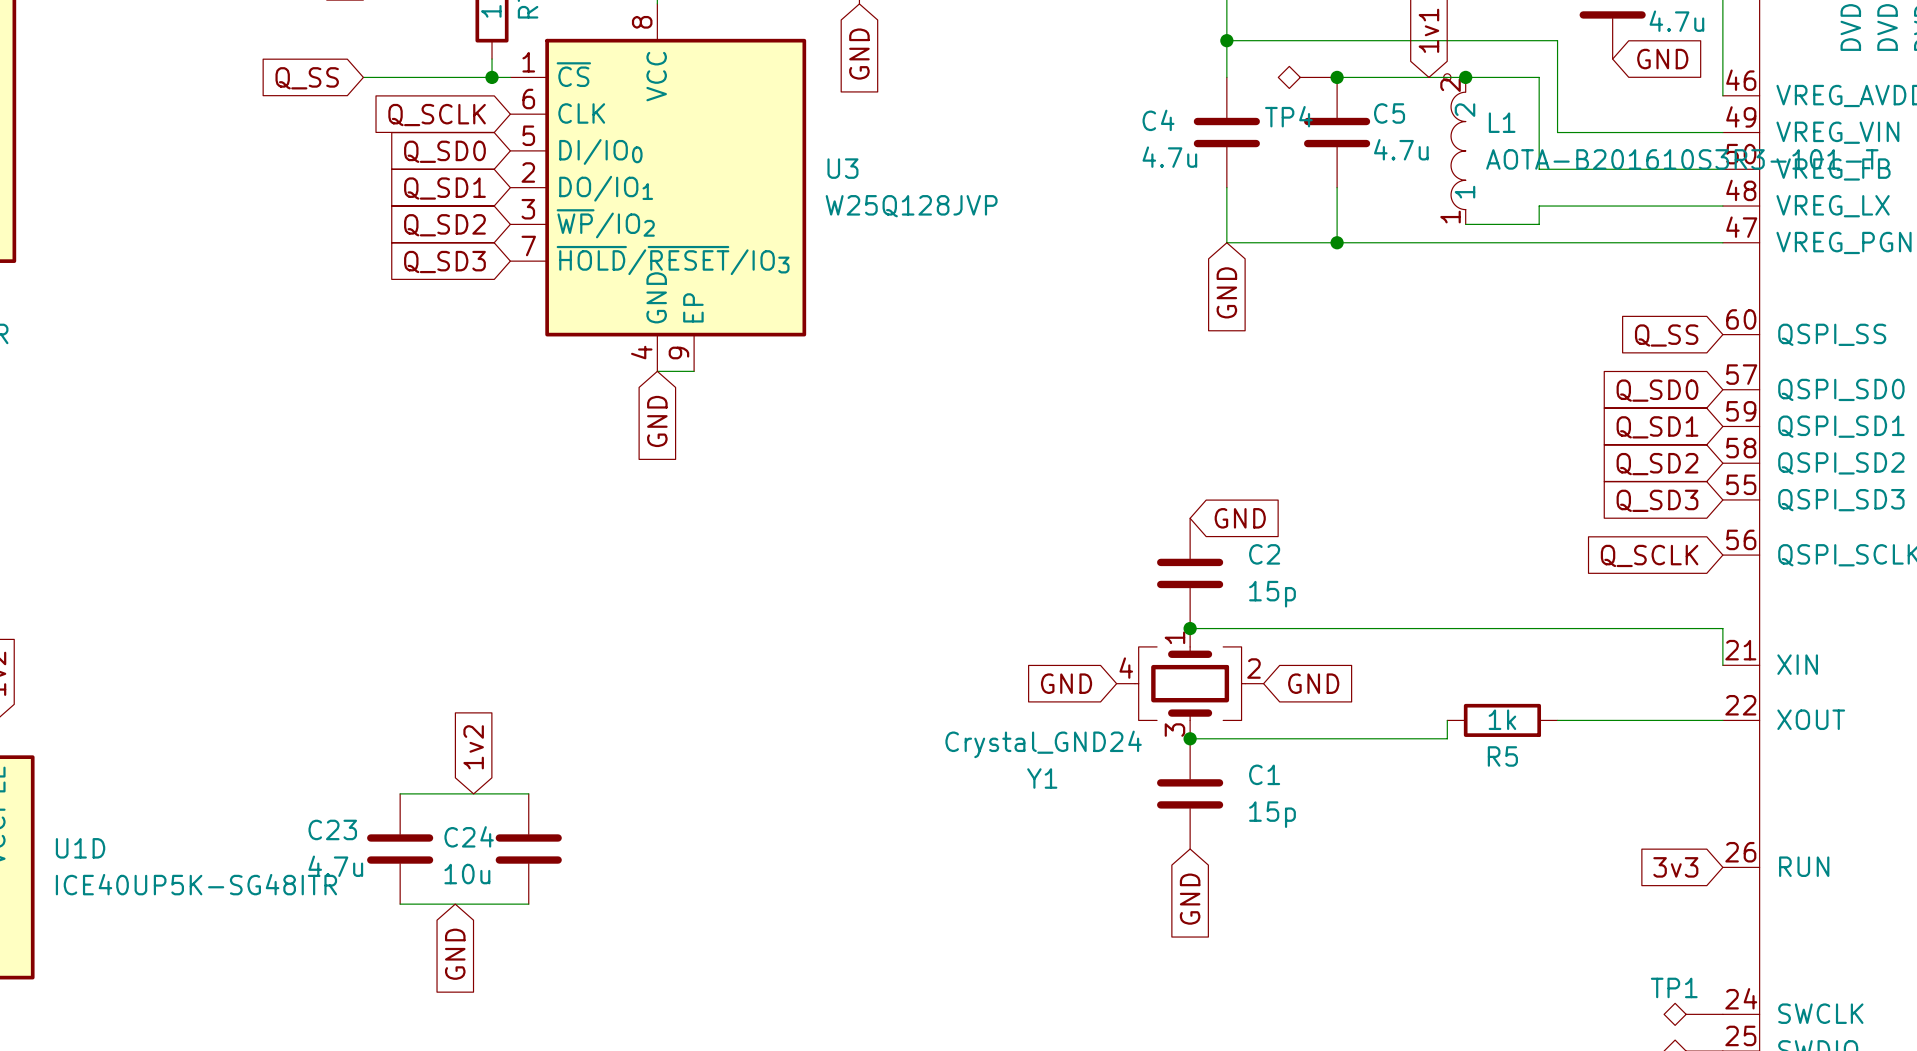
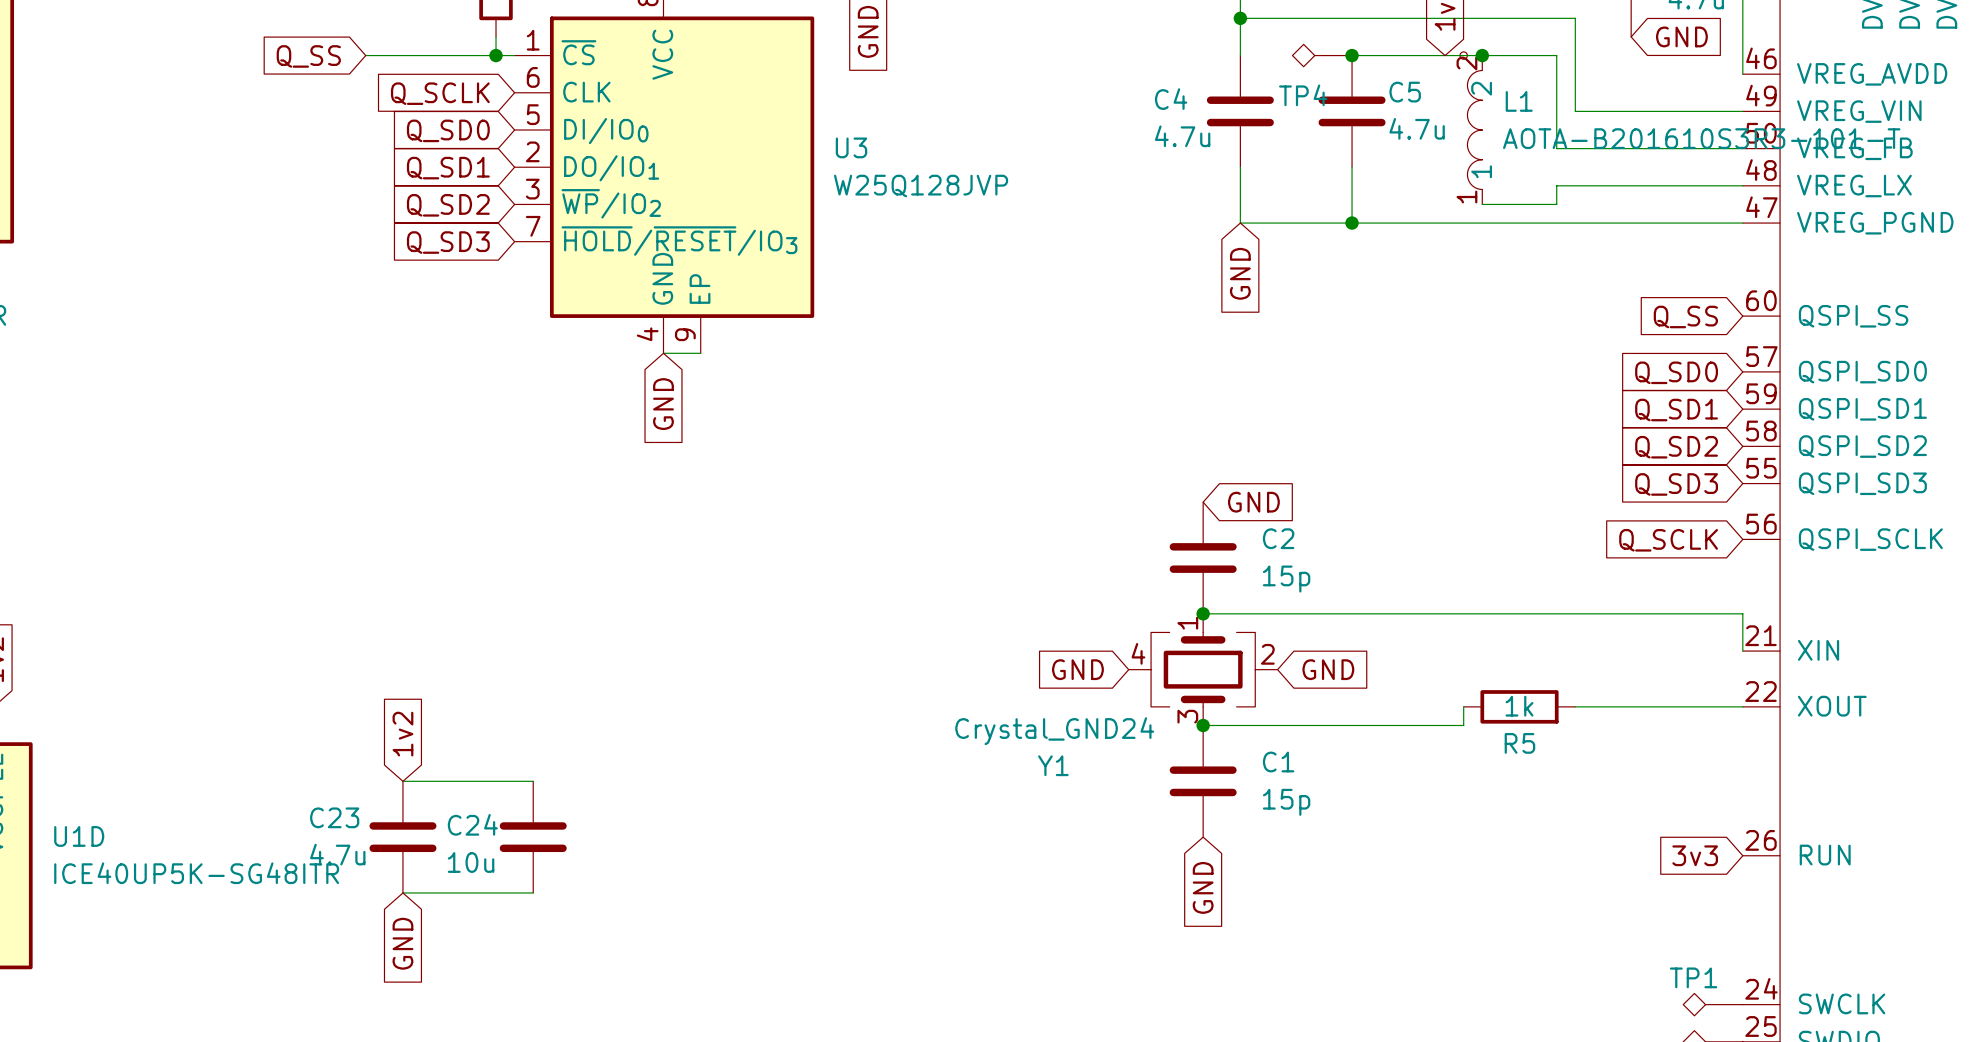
global label position: 1v2 (473, 747) -> 1v2 (402, 734)
global label position: GND (455, 954) -> GND (402, 943)

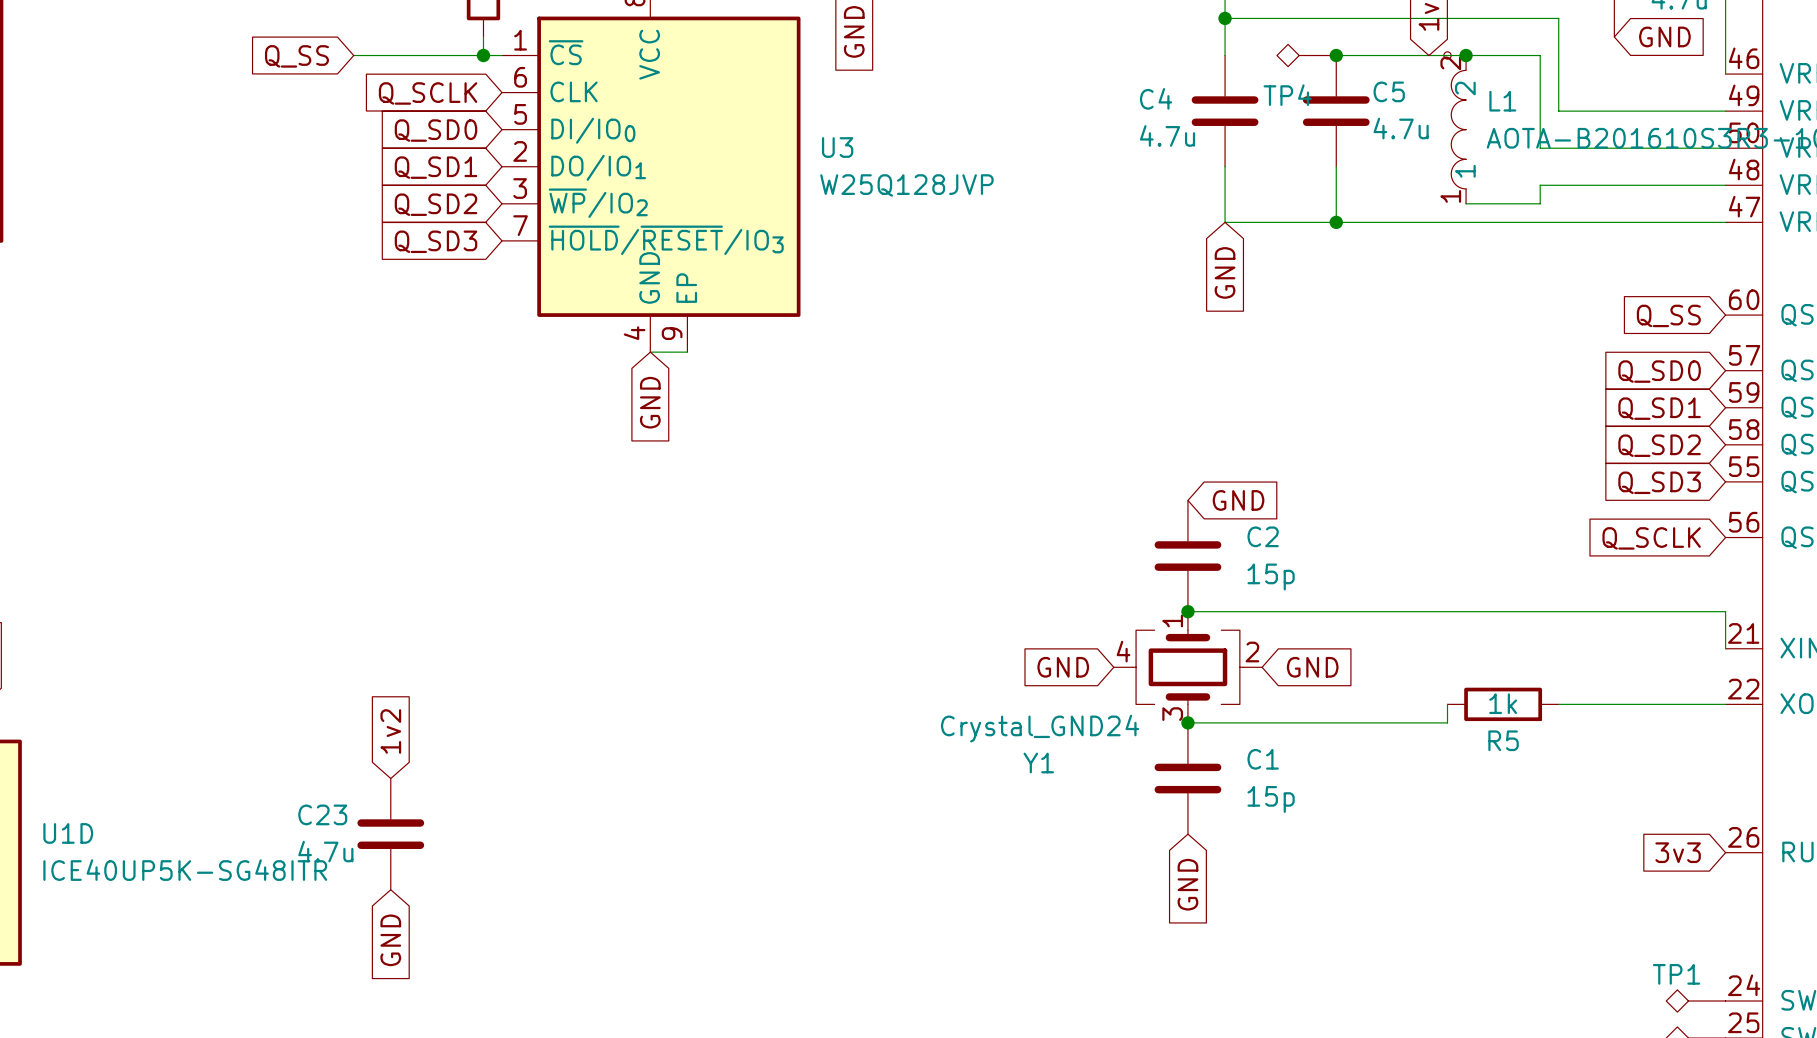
wire: (402, 781) (533, 781) -> none
C24: 10u (533, 837) -> none
wire: (402, 892) (533, 892) -> none

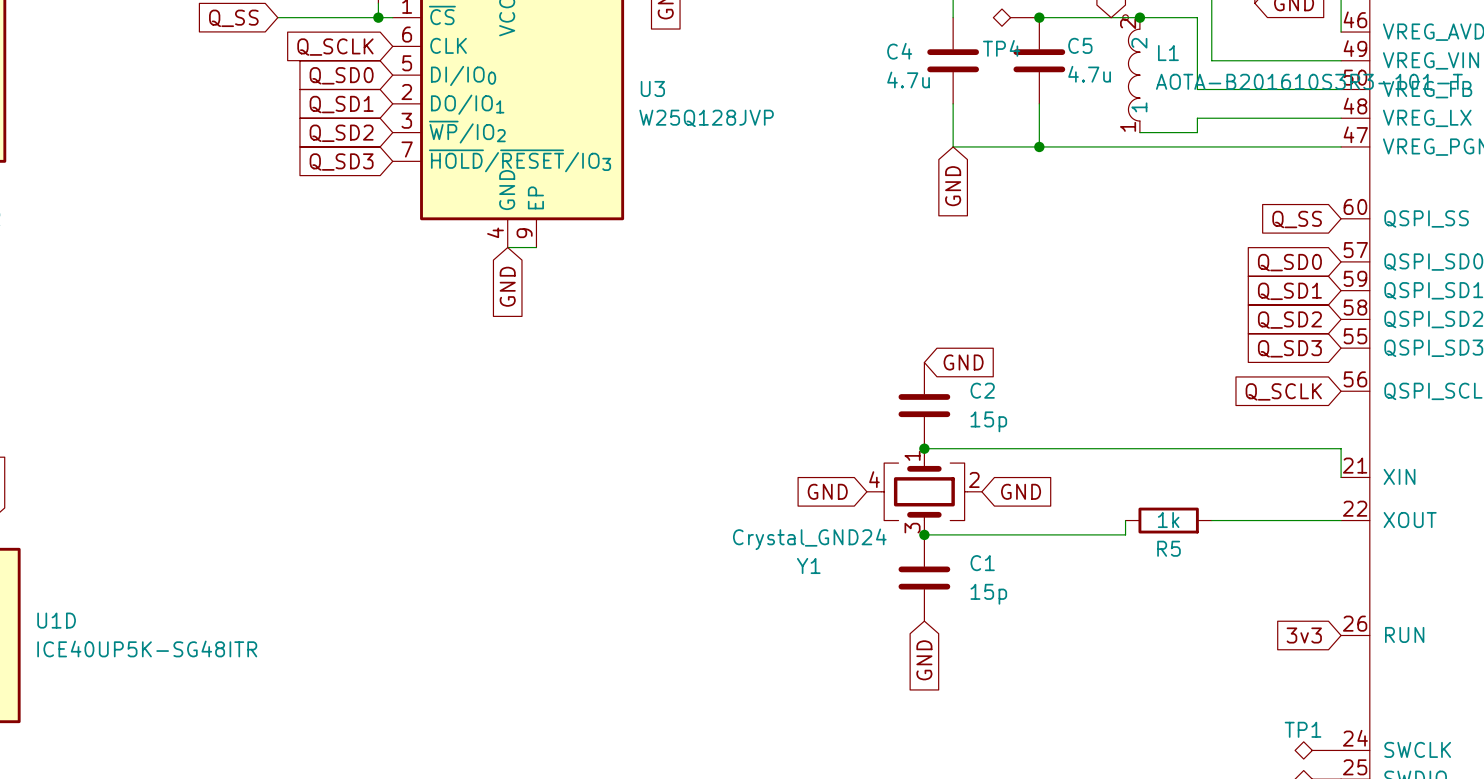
global label: 1v2 (390, 731) -> none
C23: 4.7u (390, 834) -> none
global label: GND (390, 940) -> none

